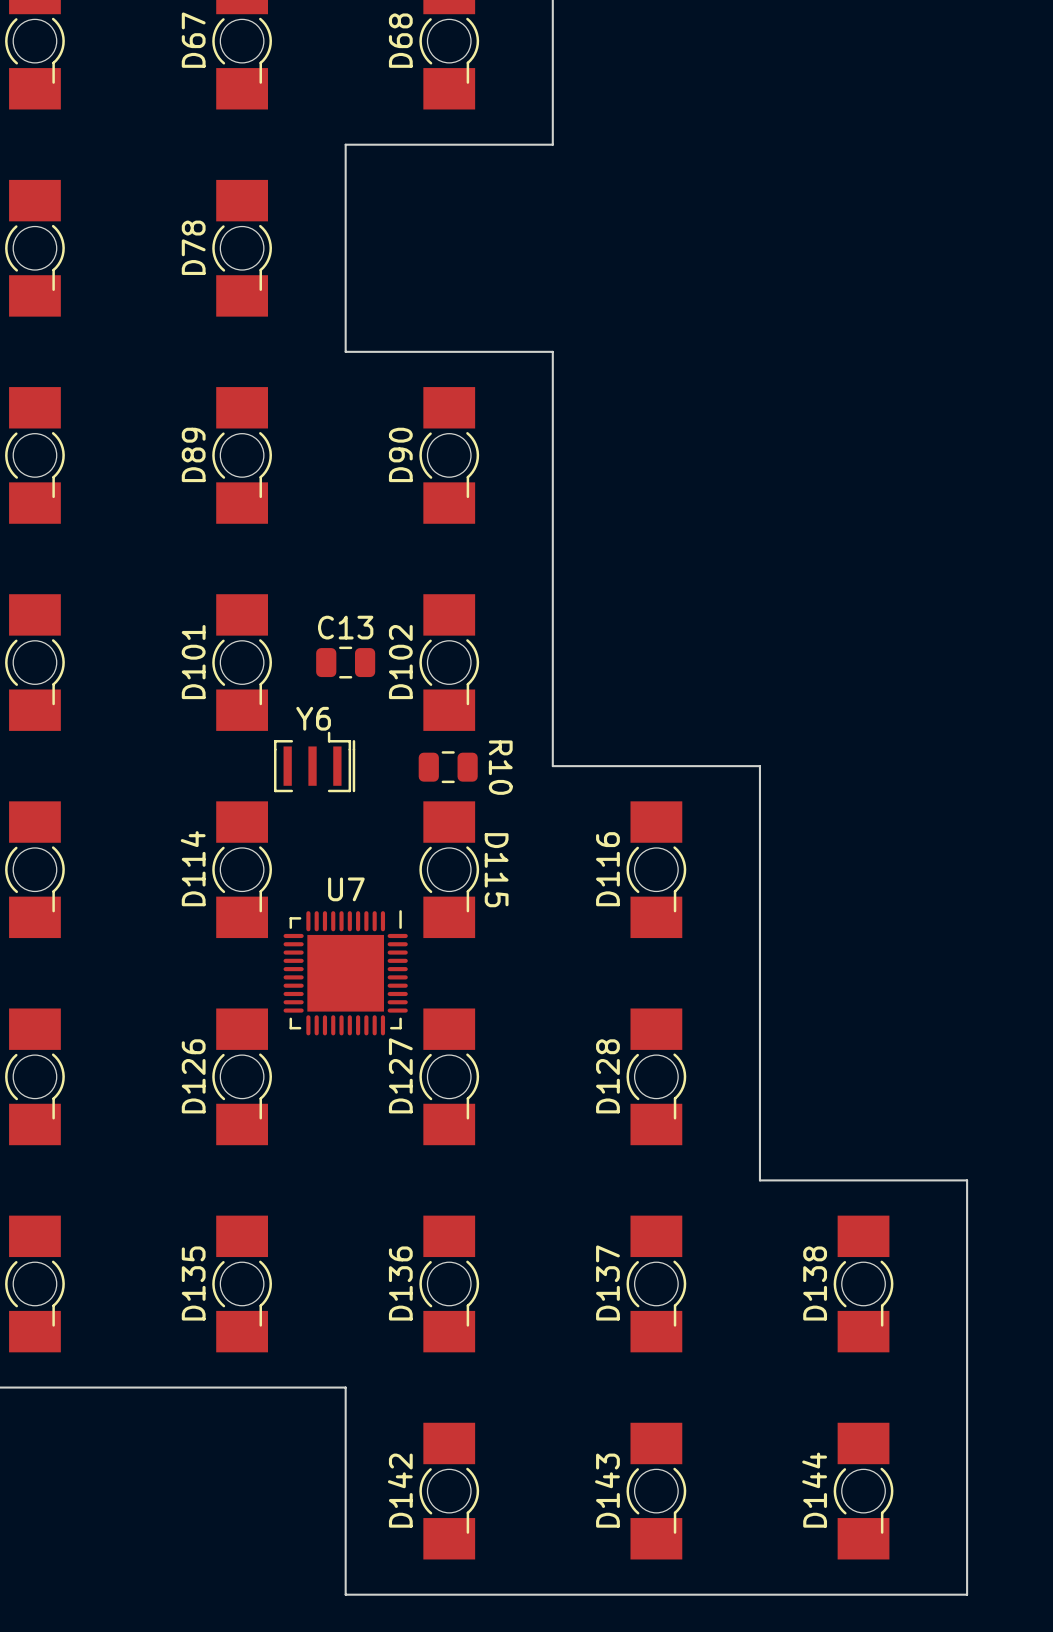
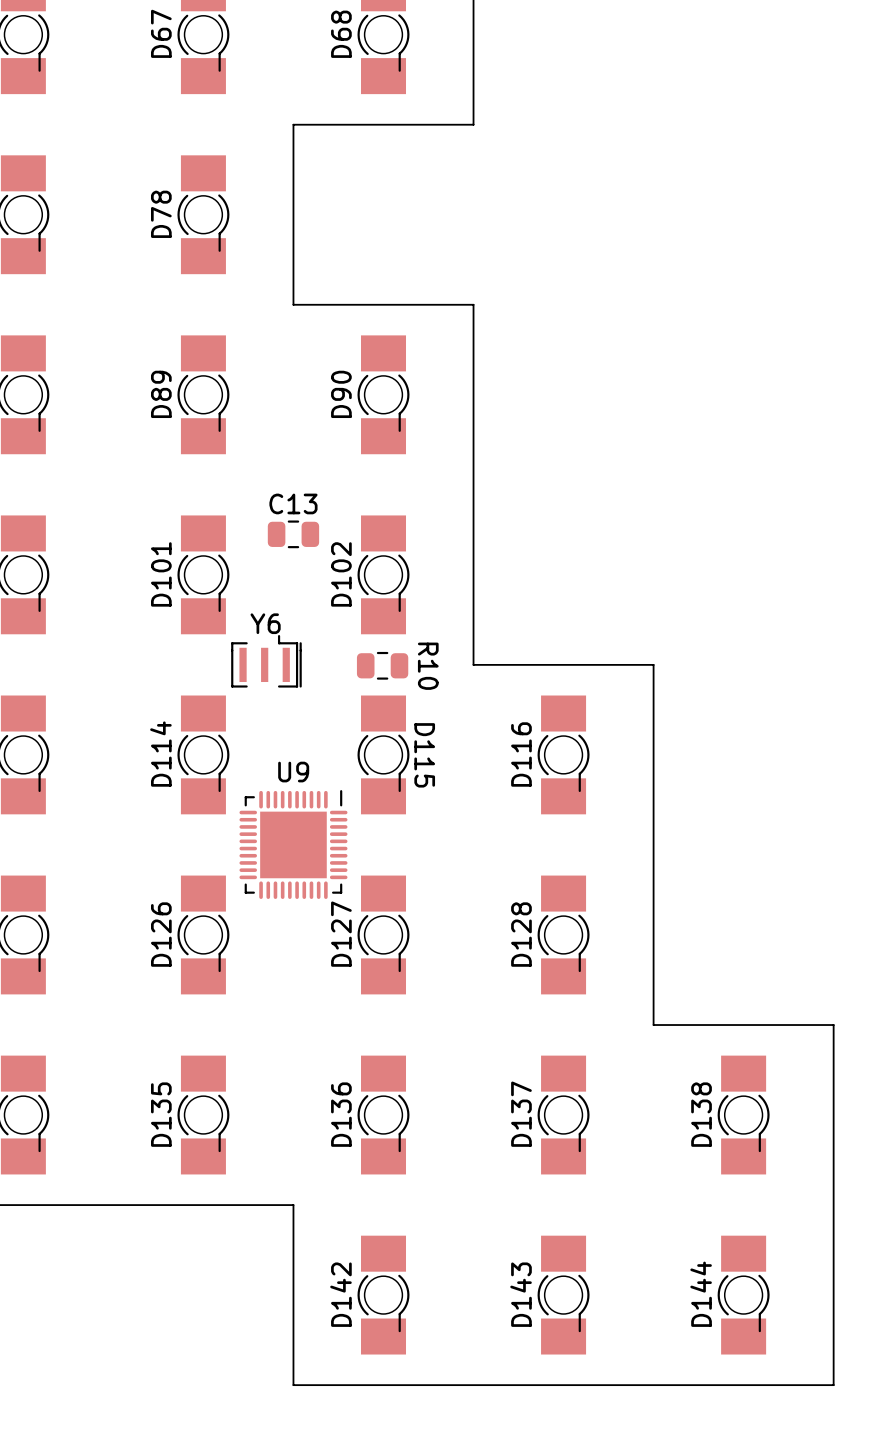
C13 position: (345, 662) -> (293, 534)
U7 name: U7 (346, 889) -> U9 (293, 772)

